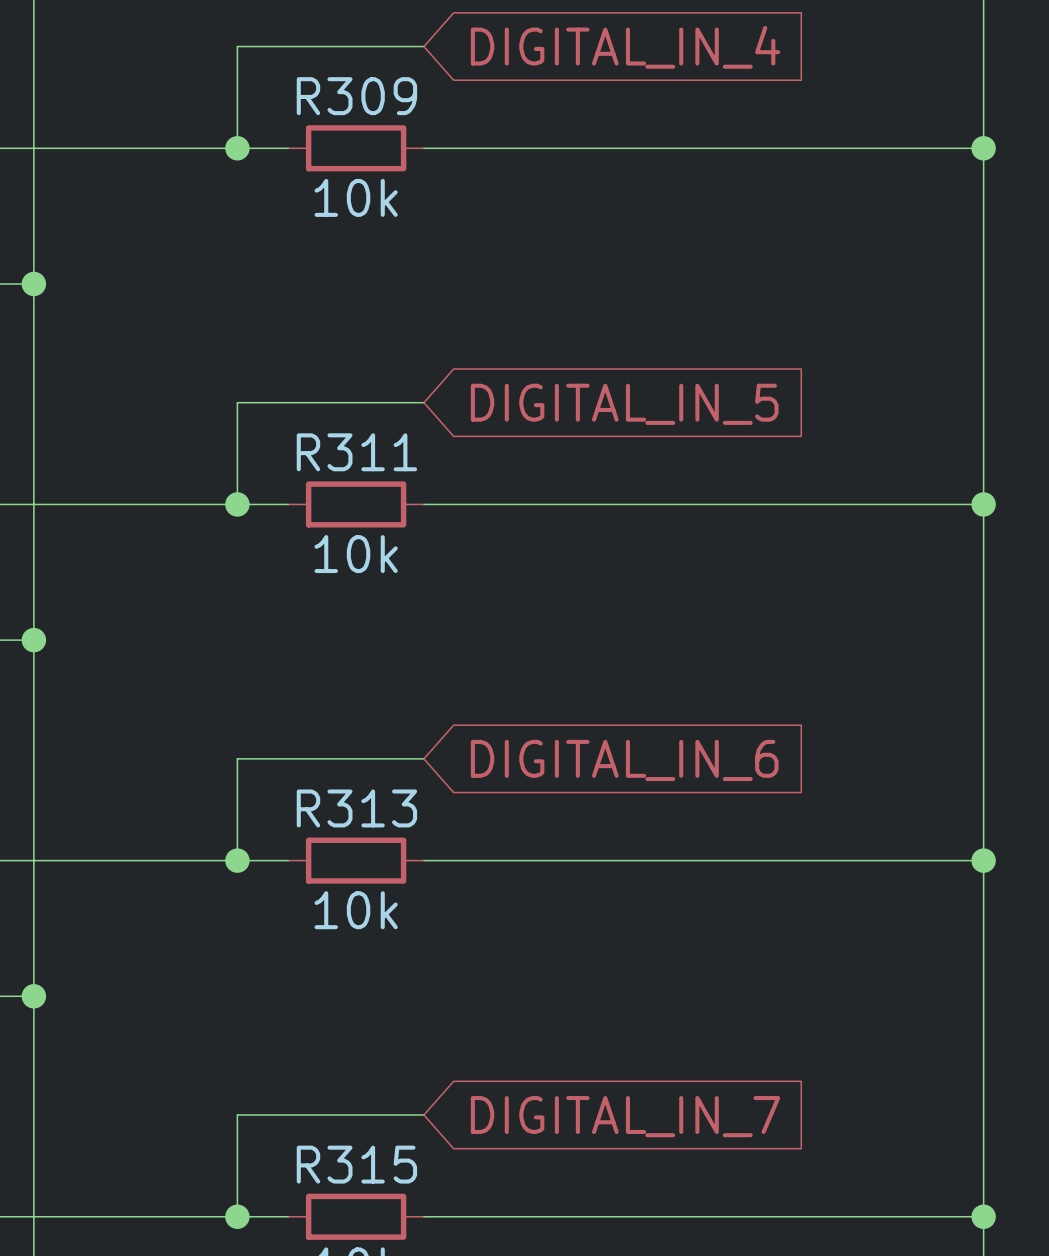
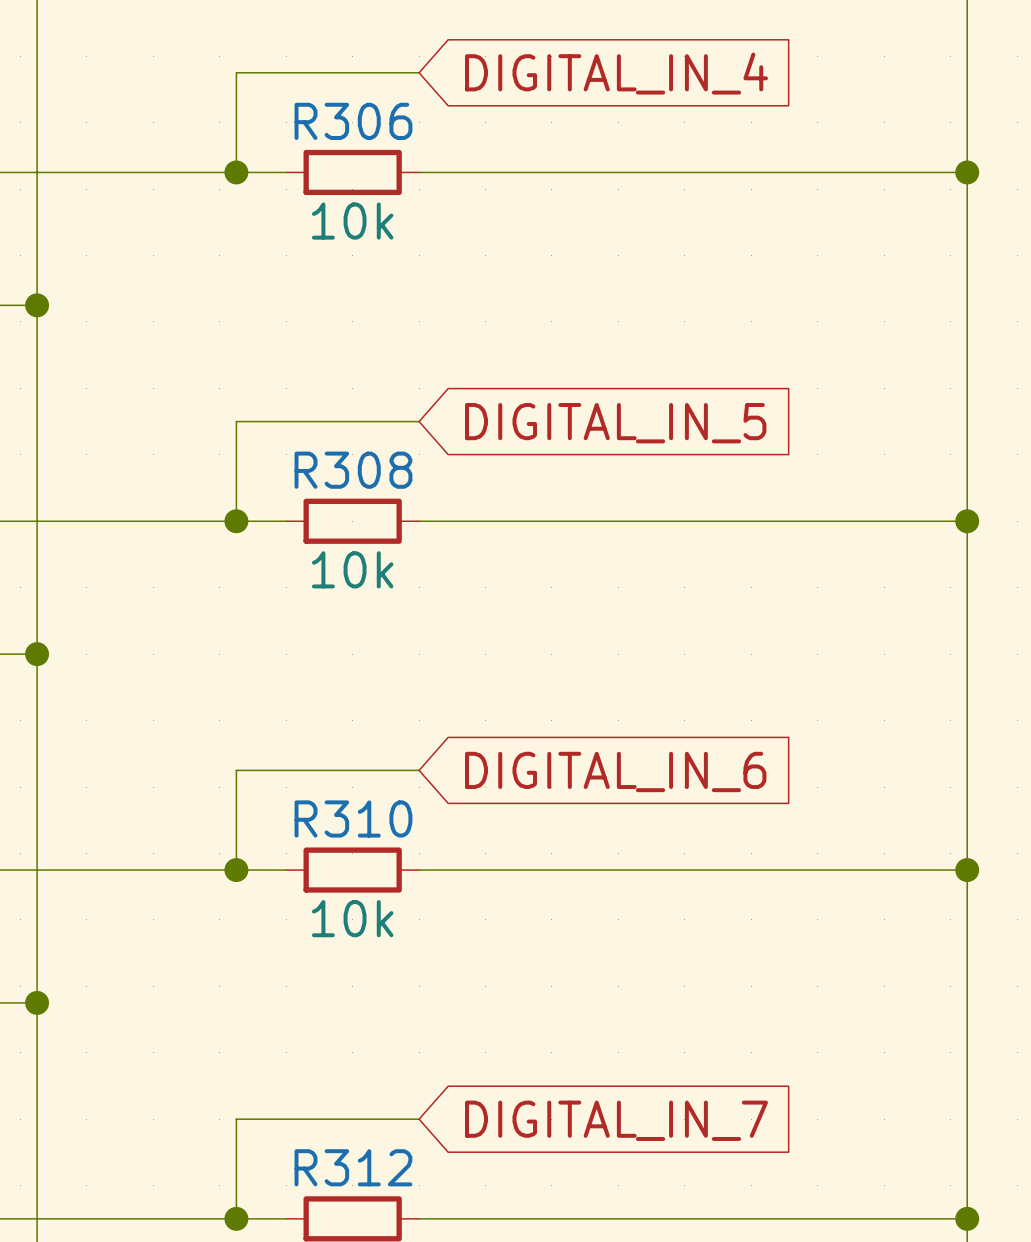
R309 name: R309 (356, 96) -> R306 (353, 121)
R311 name: R311 (356, 452) -> R308 (353, 470)
R313 name: R313 (356, 808) -> R310 (353, 818)
R315 name: R315 (356, 1164) -> R312 (353, 1167)

